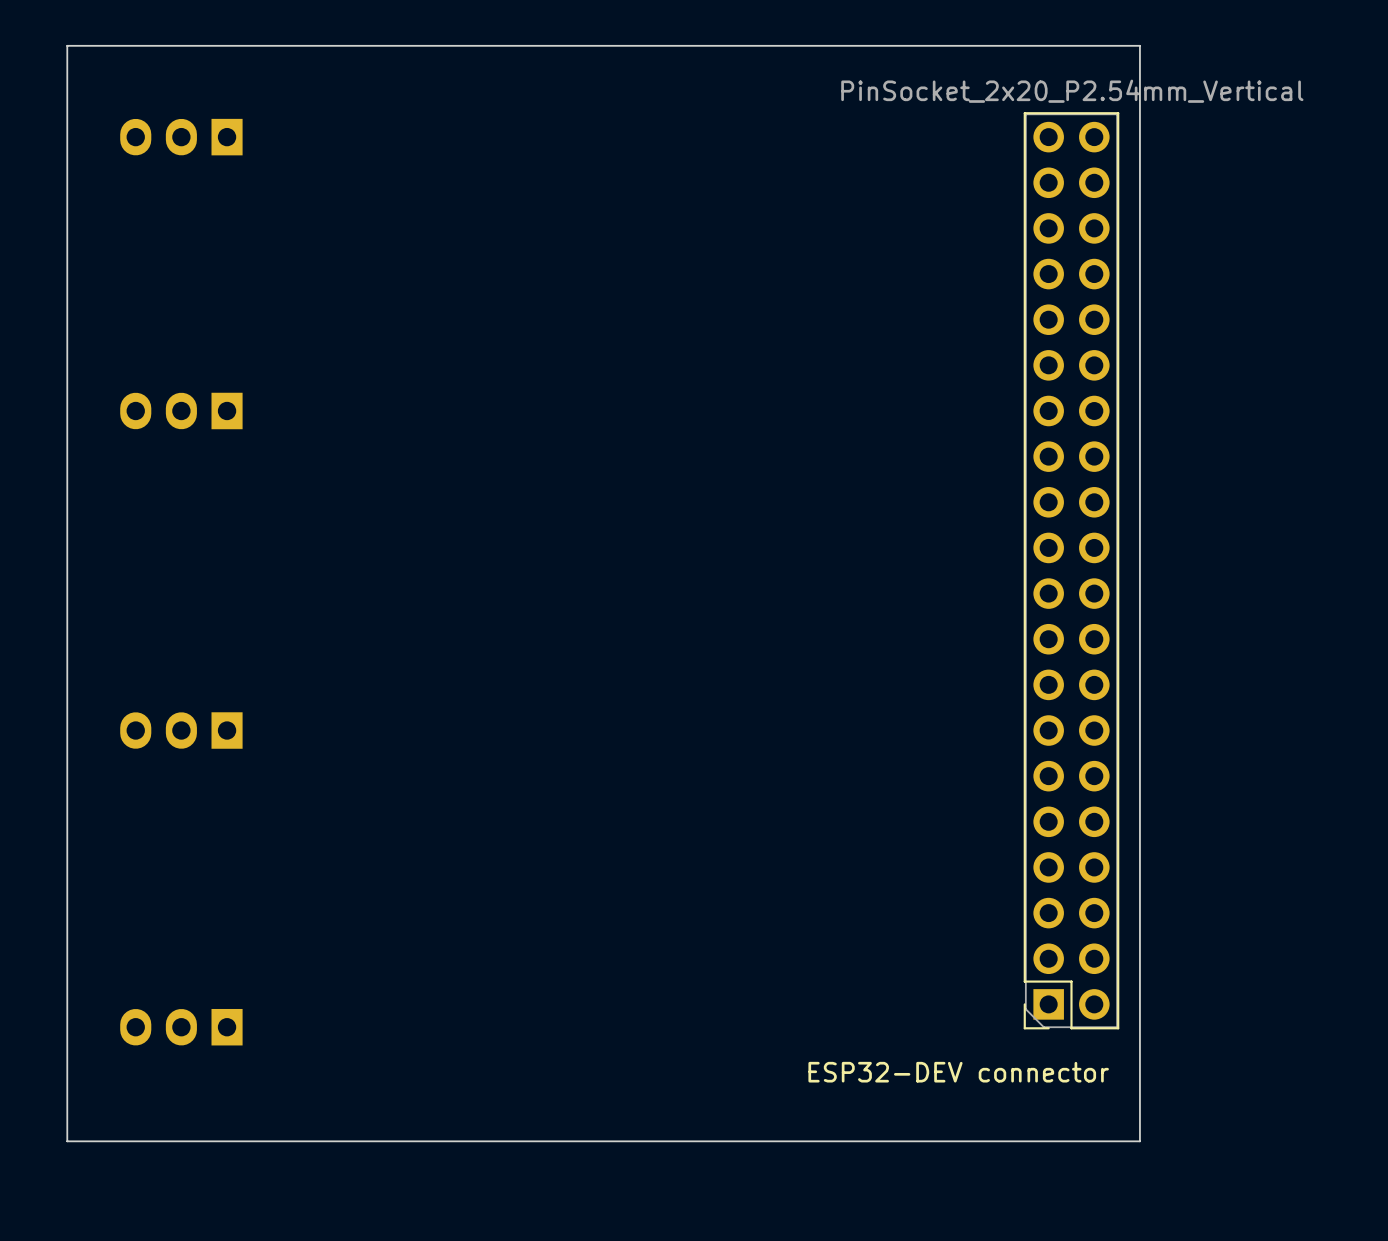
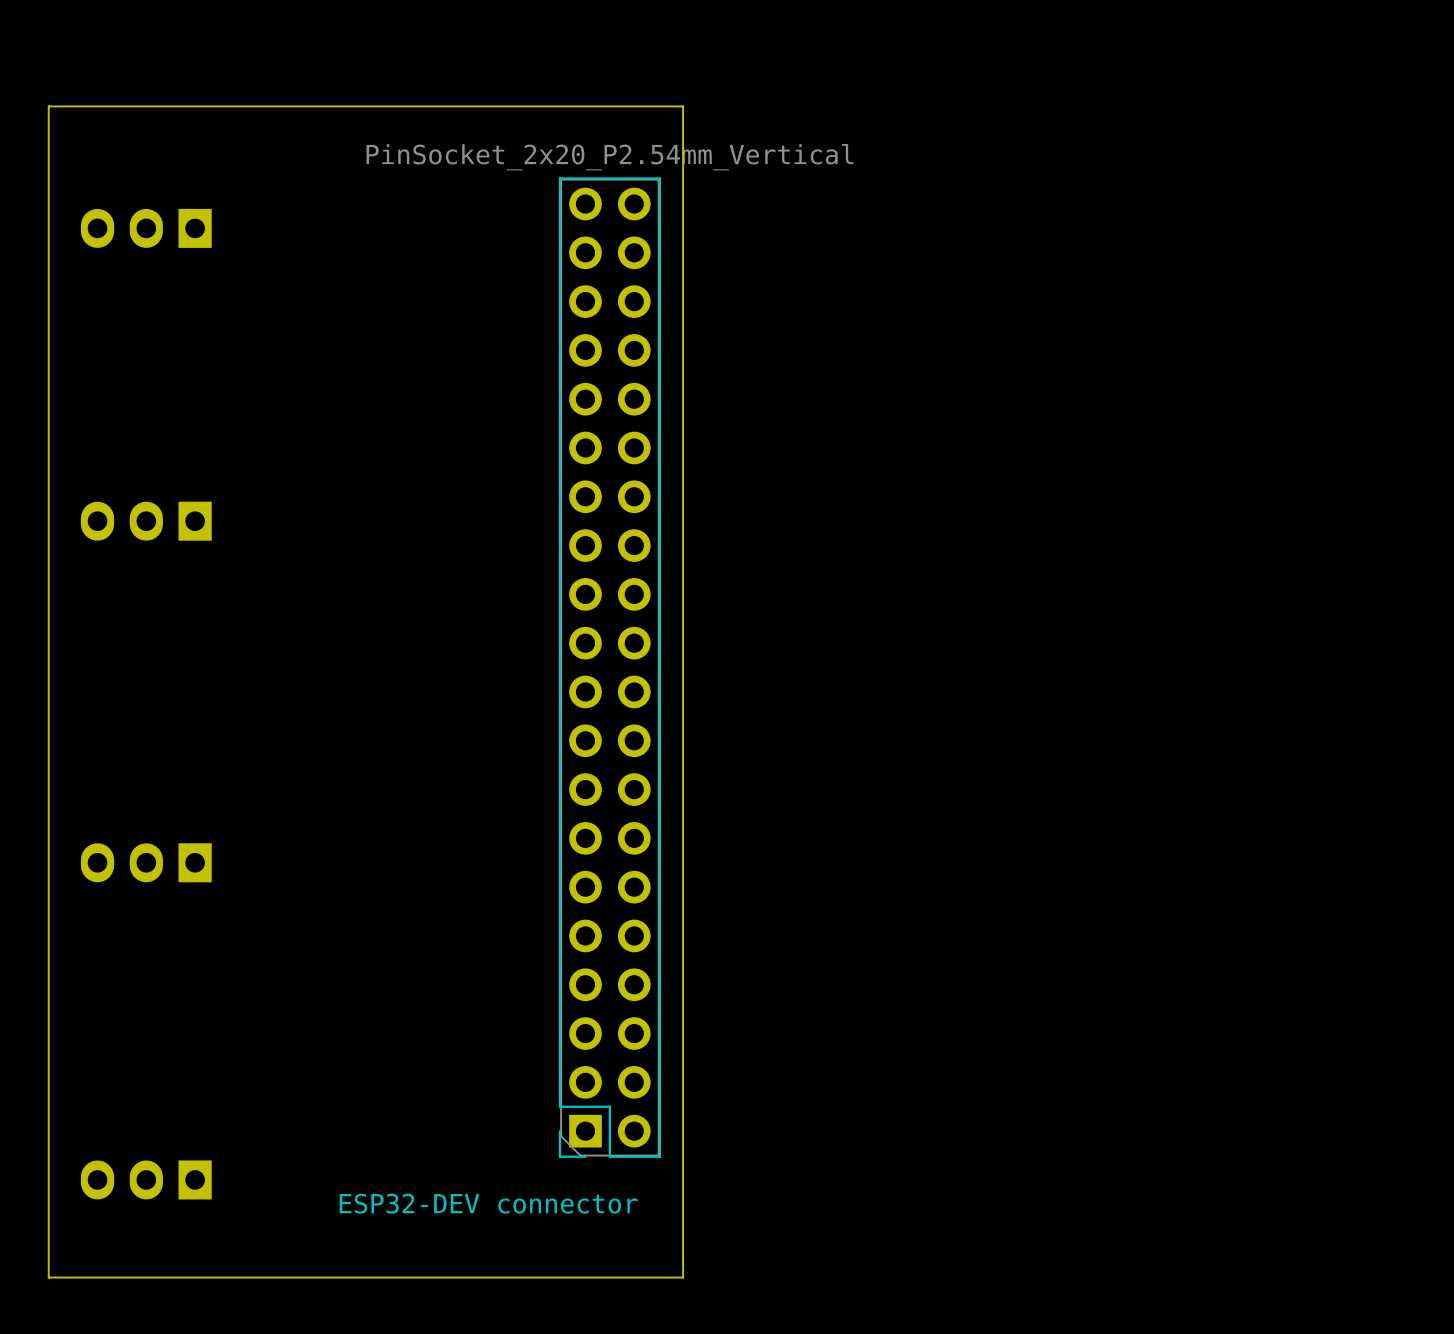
board edge: (1139, 45) (67, 45) (67, 1141) (1139, 1141) (1139, 45) -> (683, 106) (683, 1277) (48, 1277) (48, 106) (683, 106)
ESP32-DEV connector position: (1071, 570) -> (609, 667)

